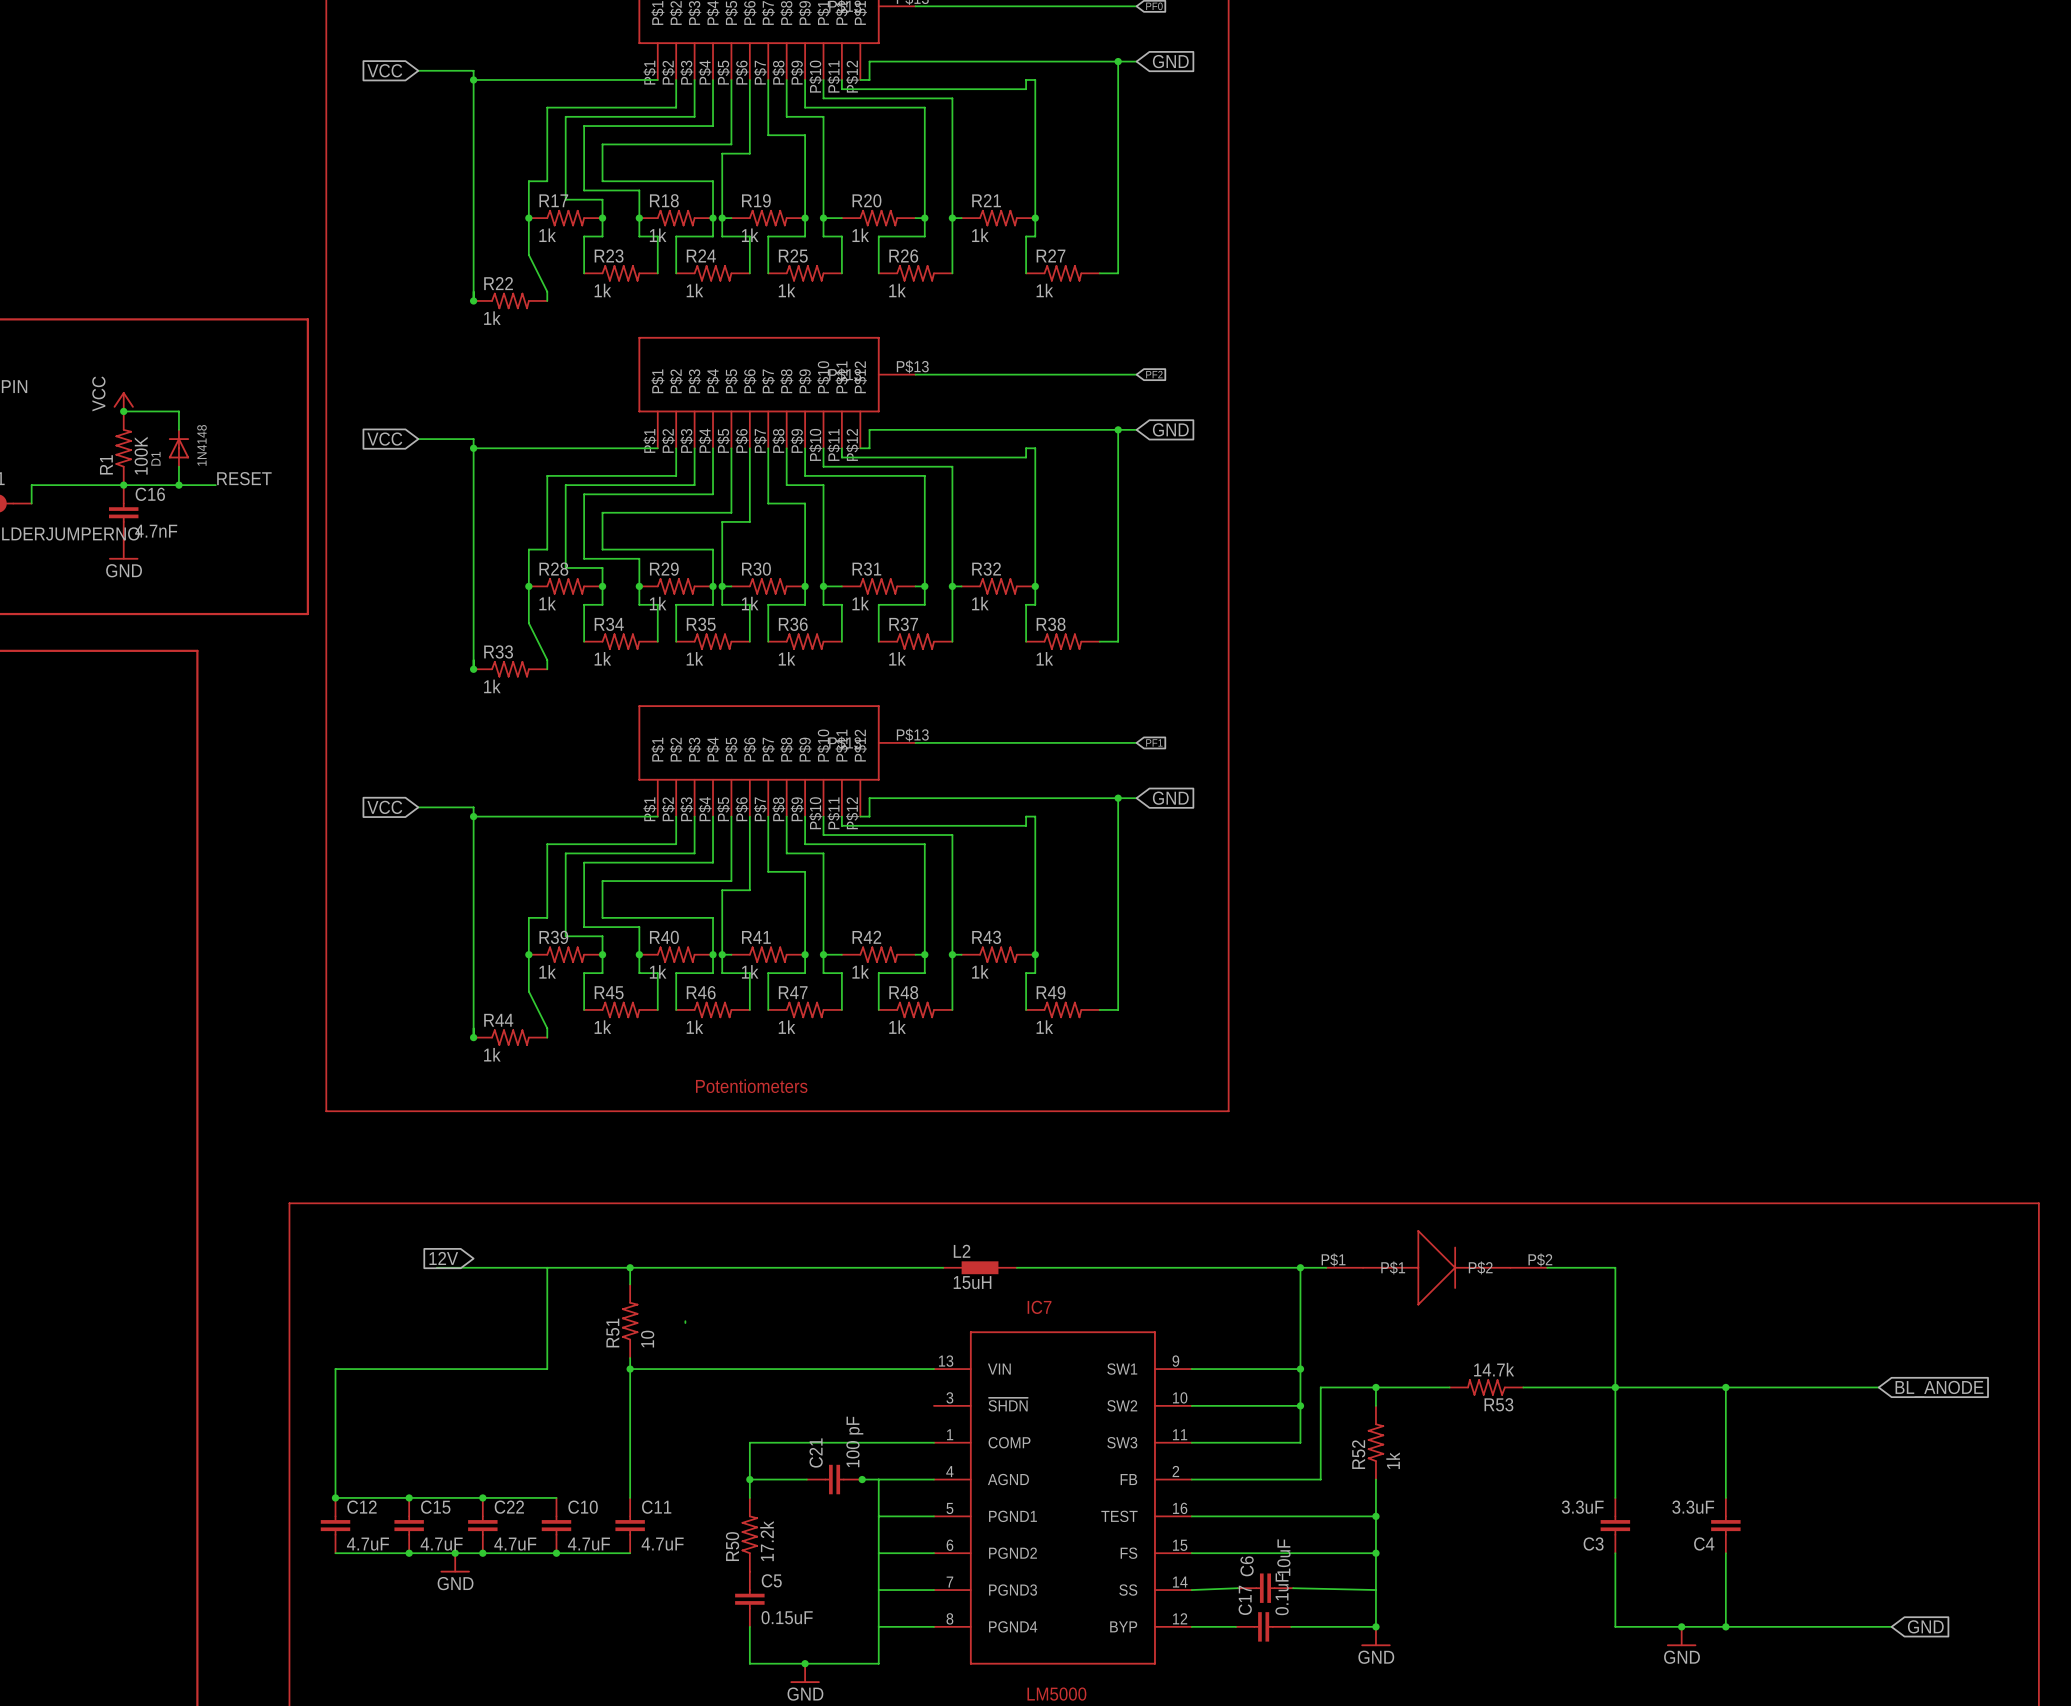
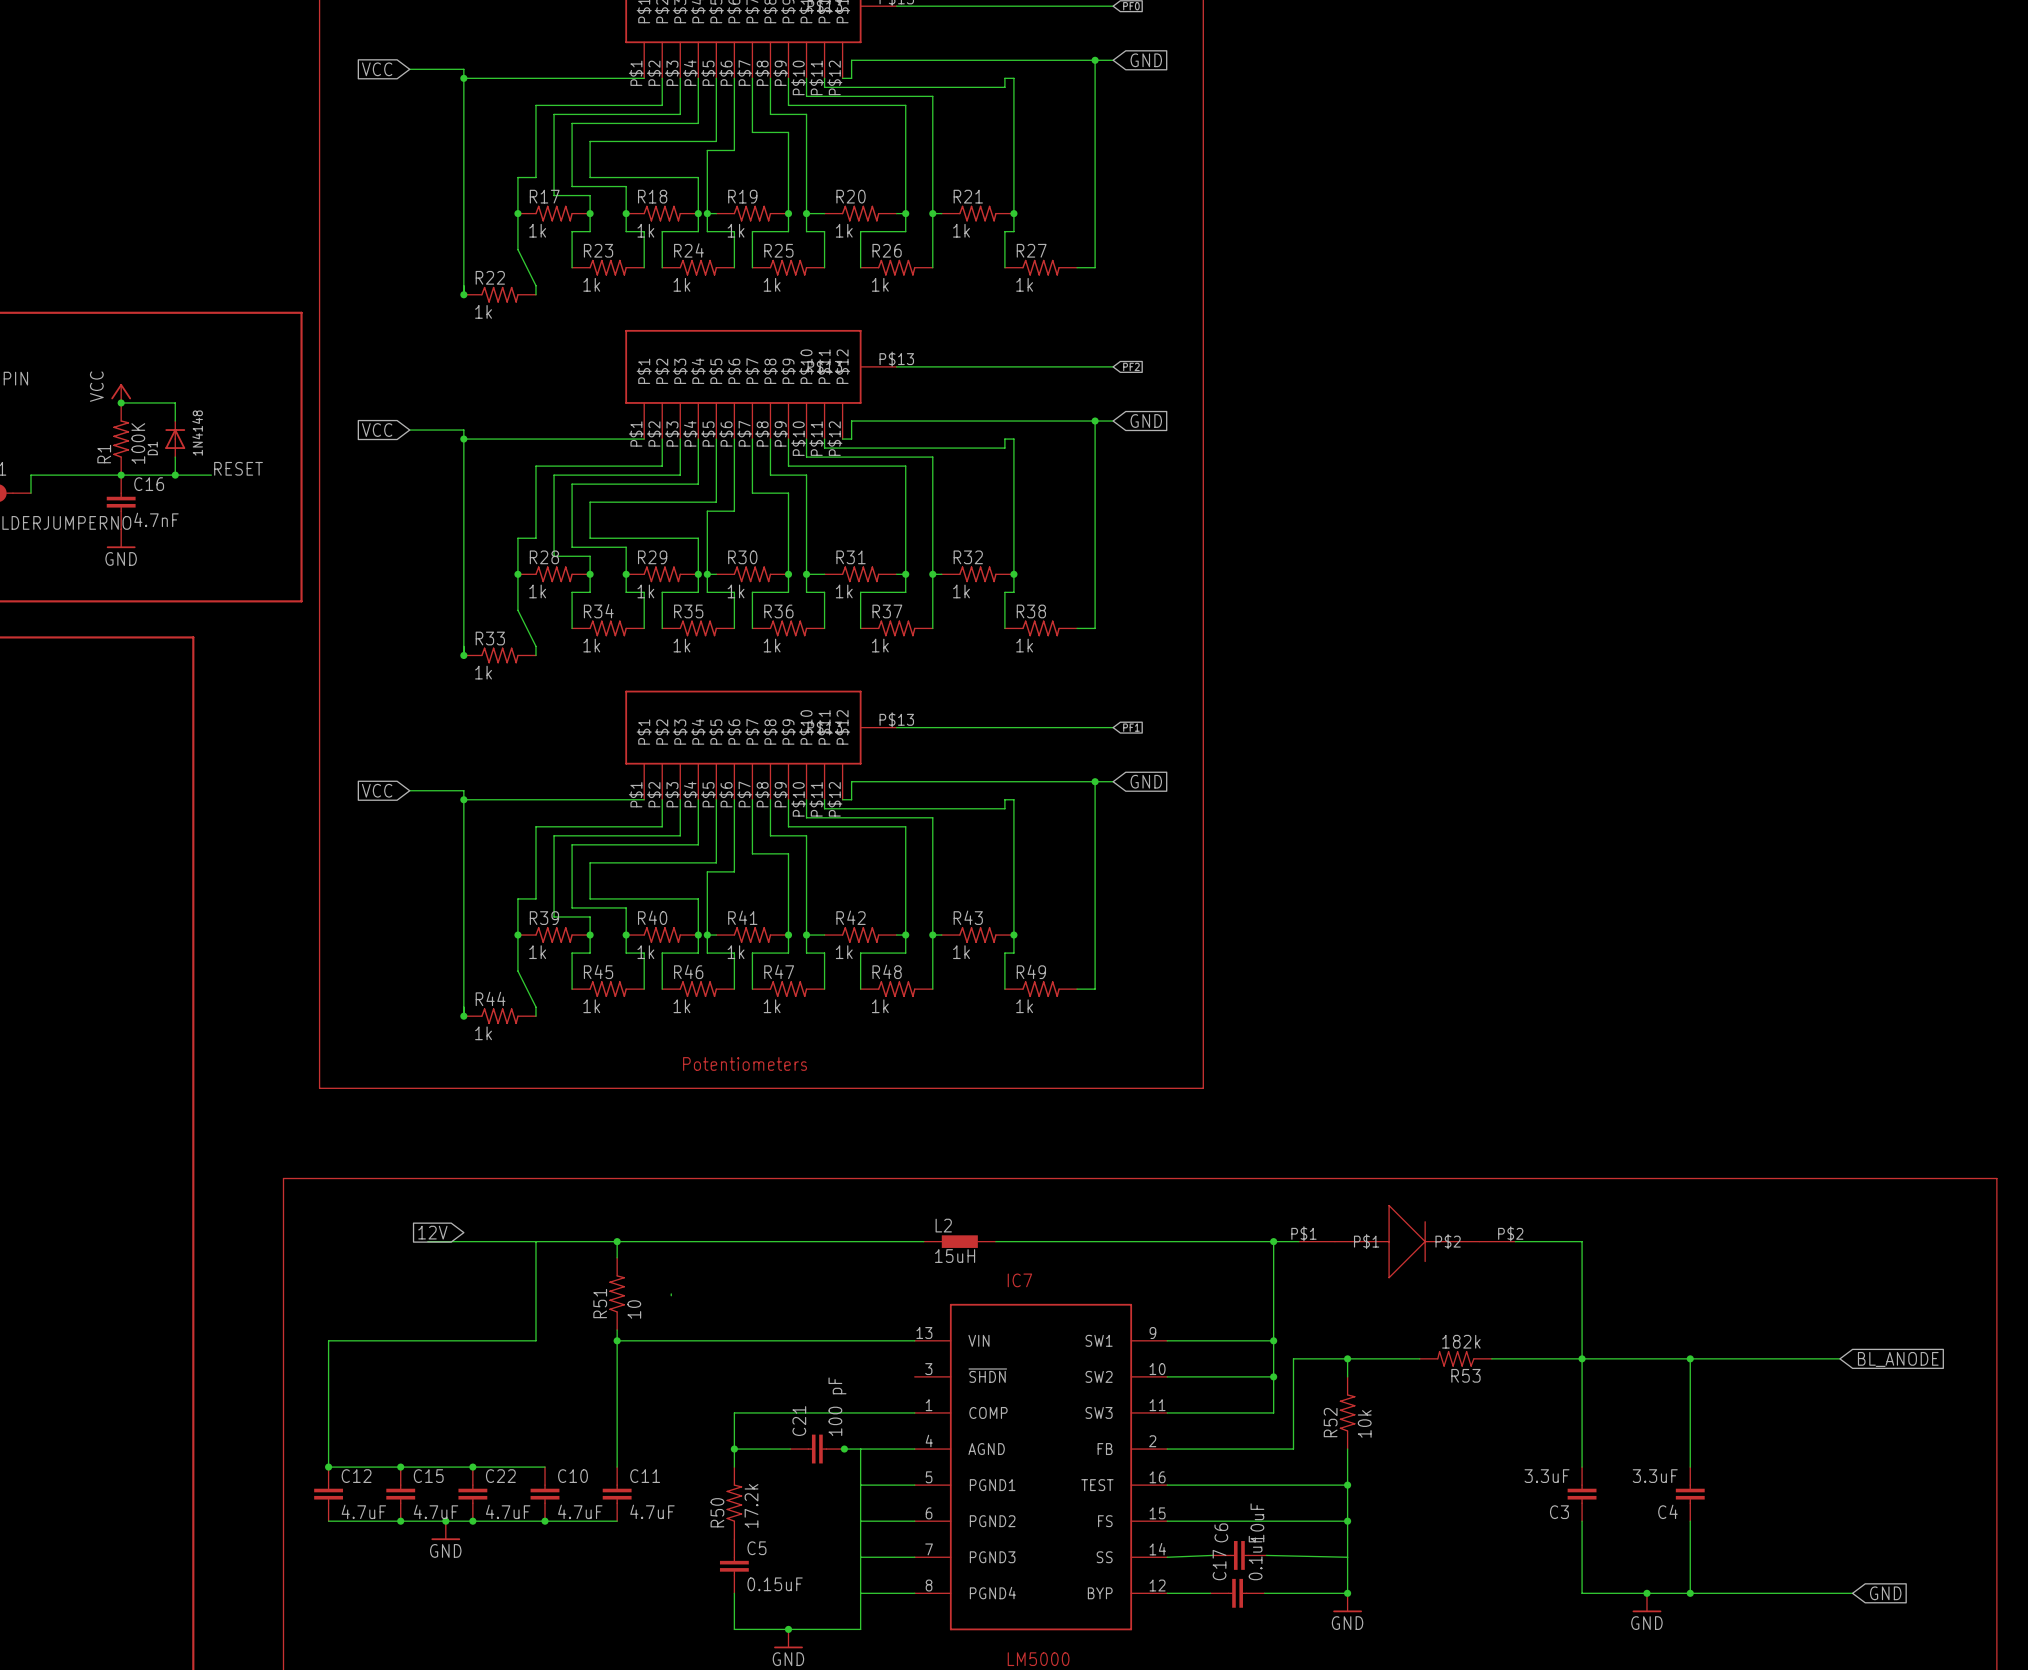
R53 value: 14.7k (1494, 1369) -> 182k (1461, 1341)
R52 value: 1k (1393, 1460) -> 10k (1364, 1423)

